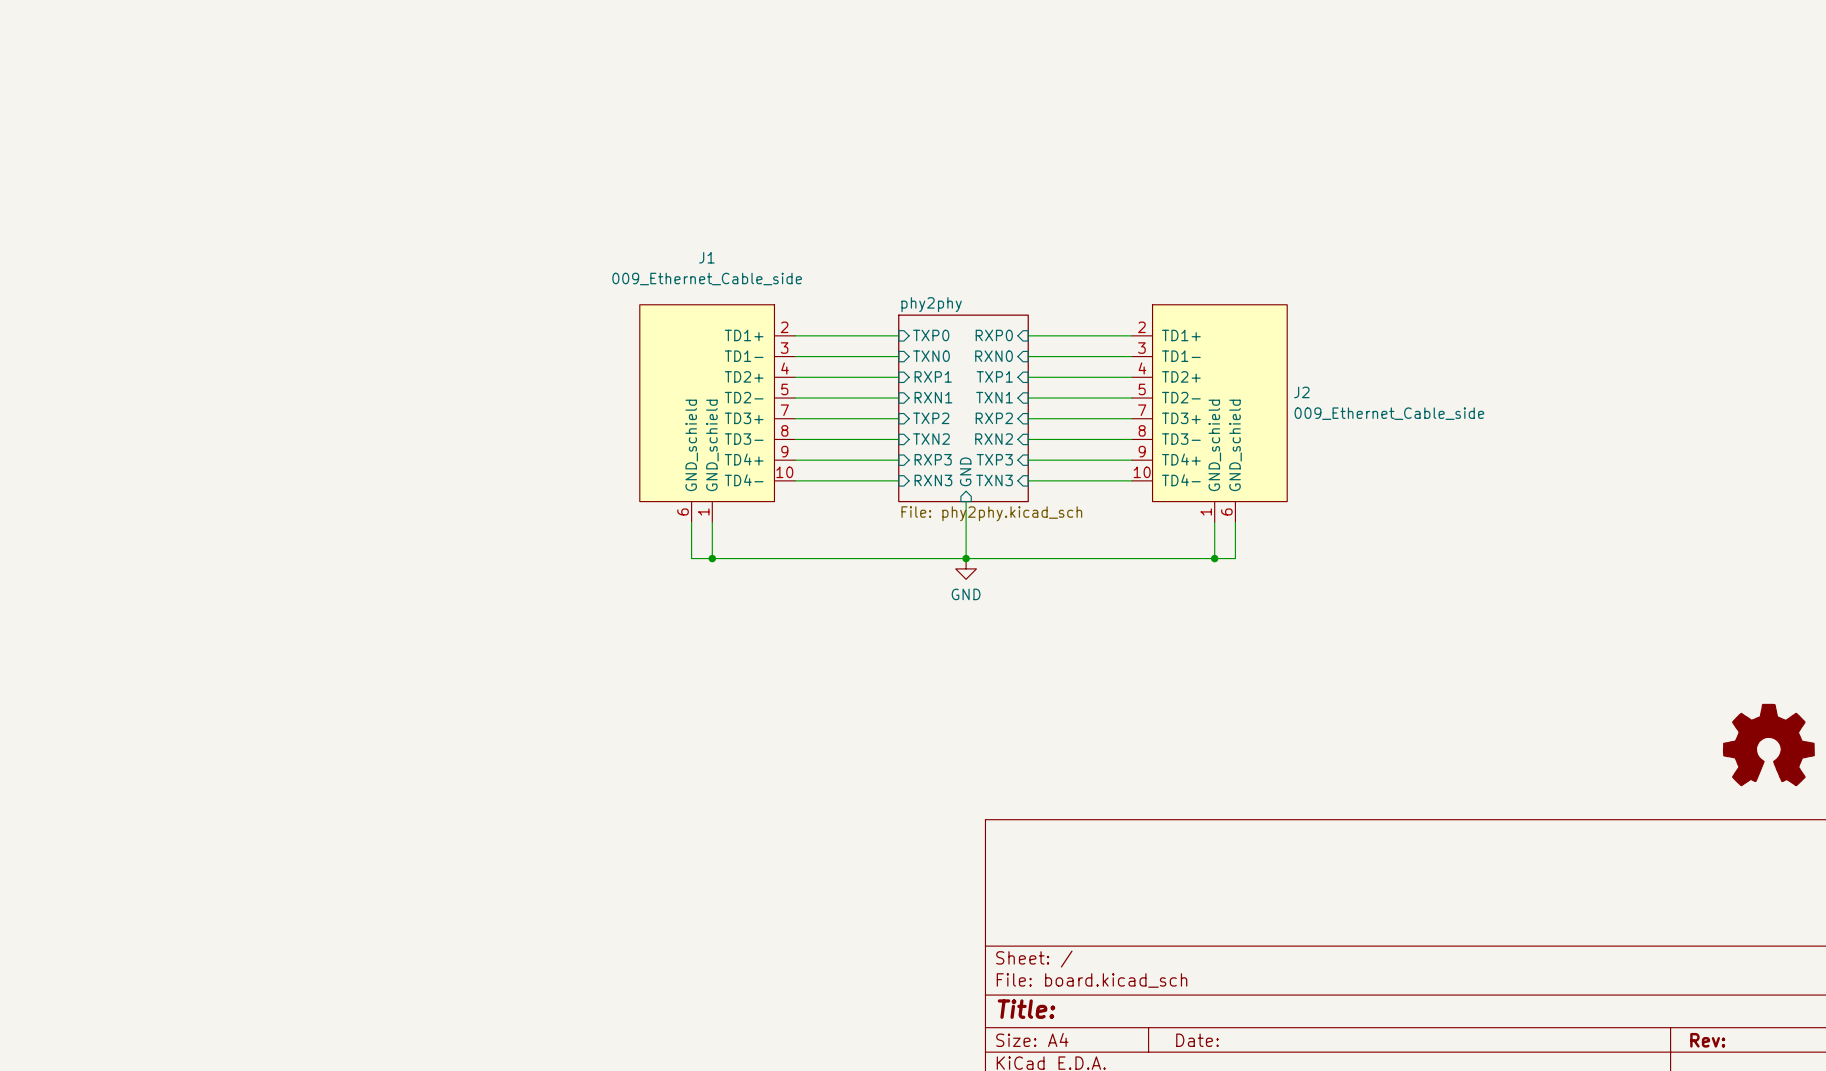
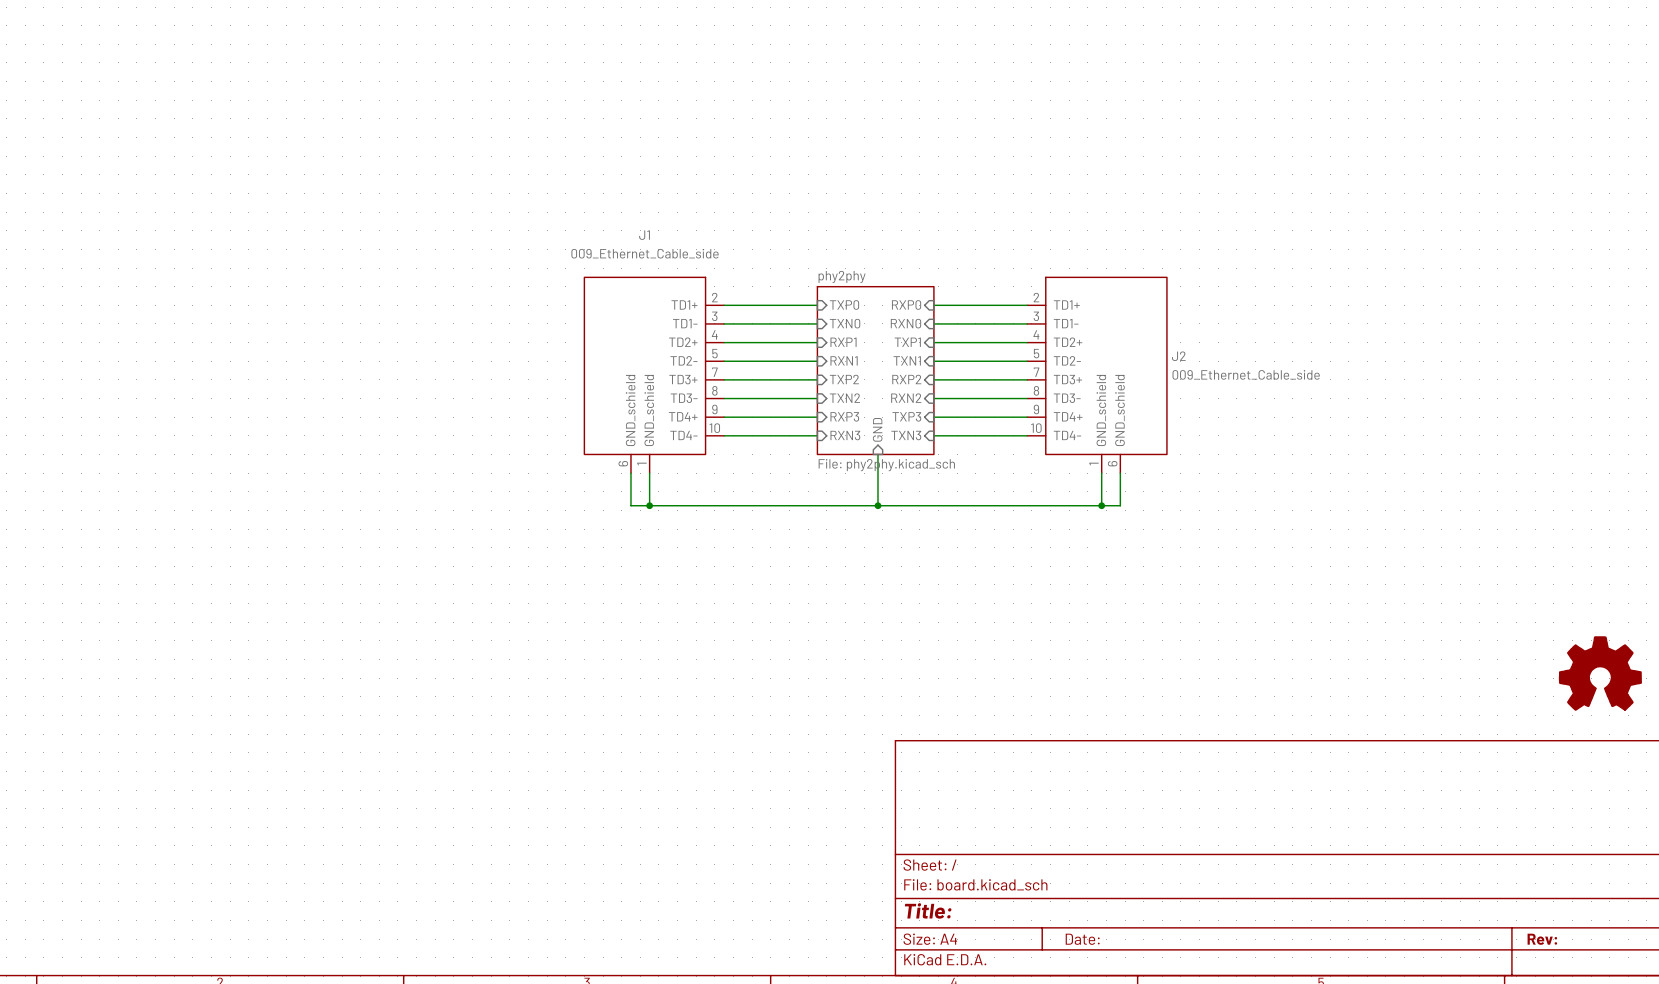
power symbol: GND (966, 568) -> none

